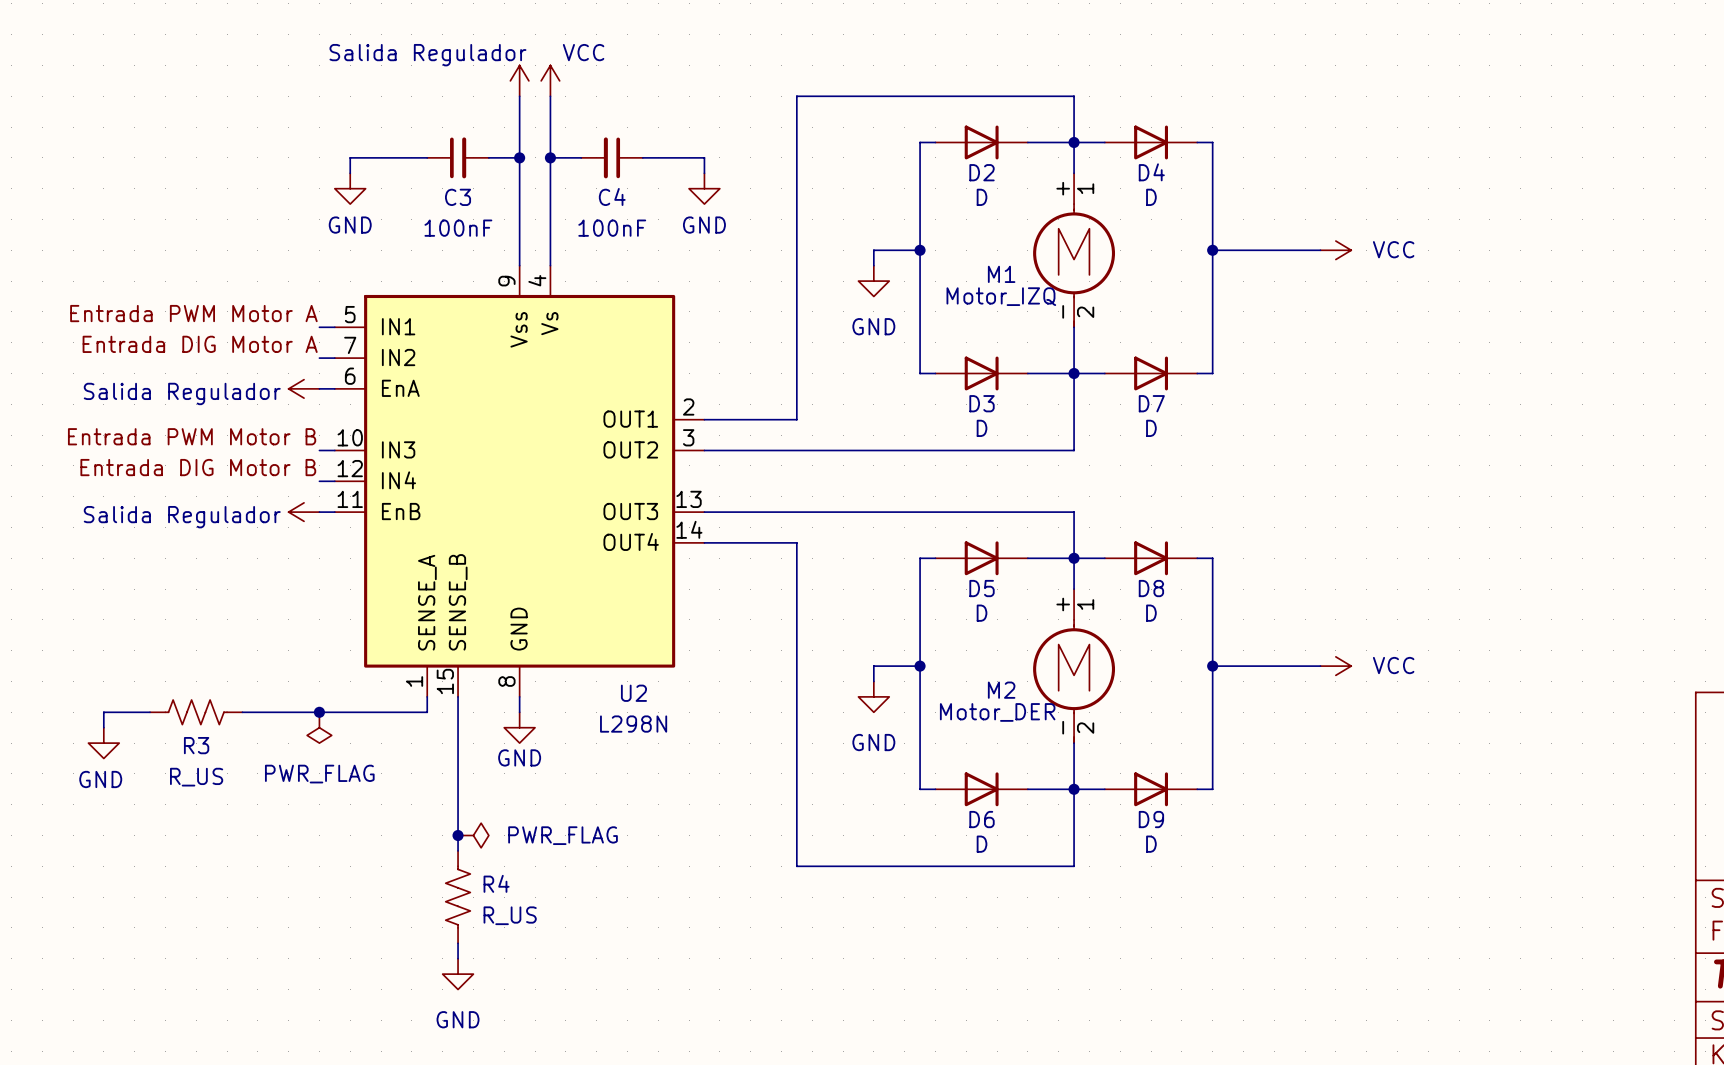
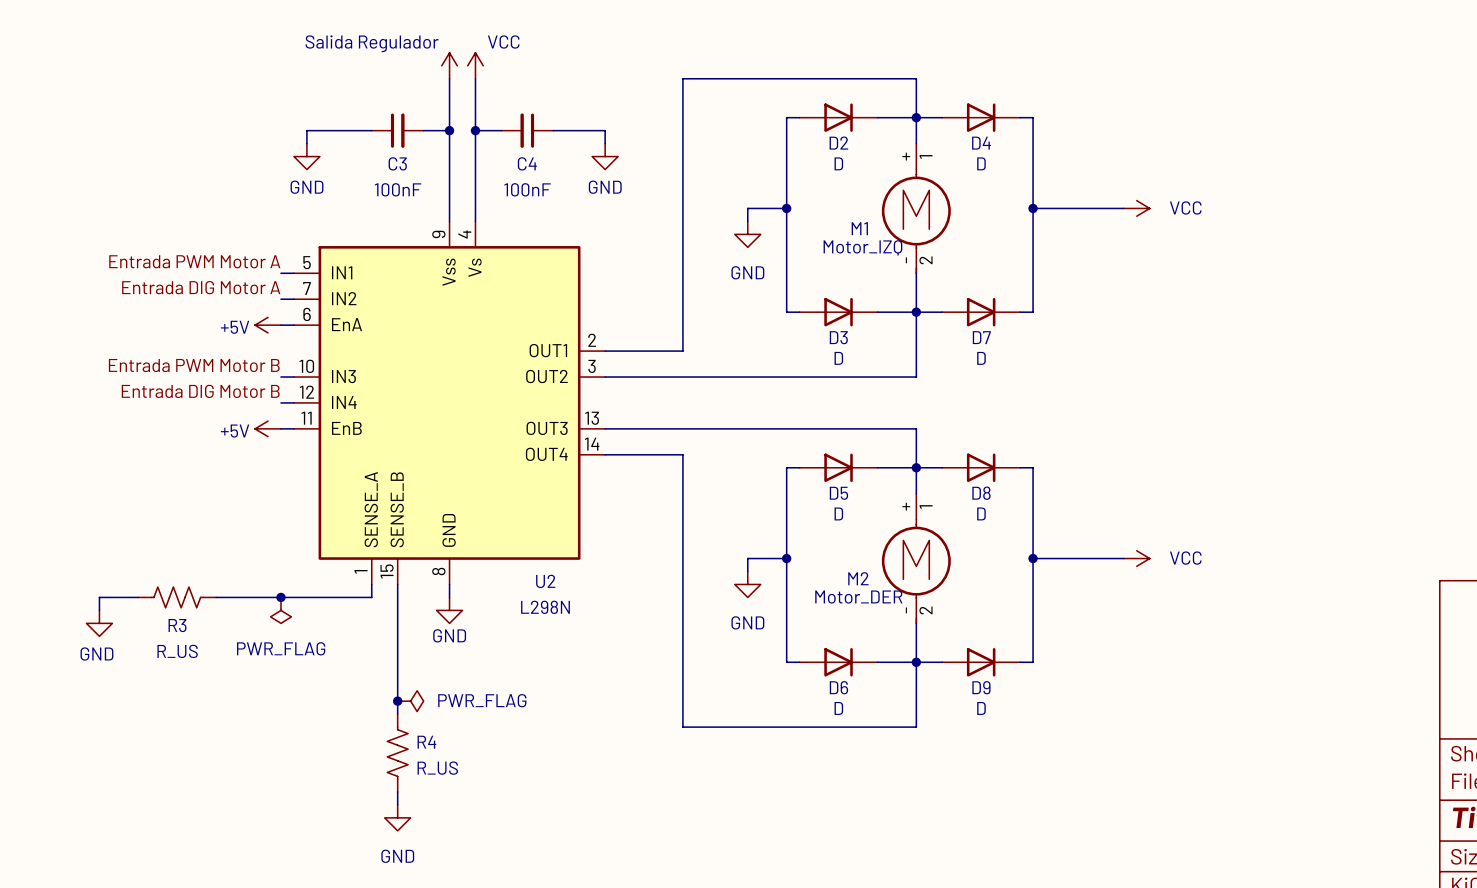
power symbol: Salida Regulador (304, 388) -> +5V (268, 325)
power symbol: Salida Regulador (304, 512) -> +5V (268, 428)

